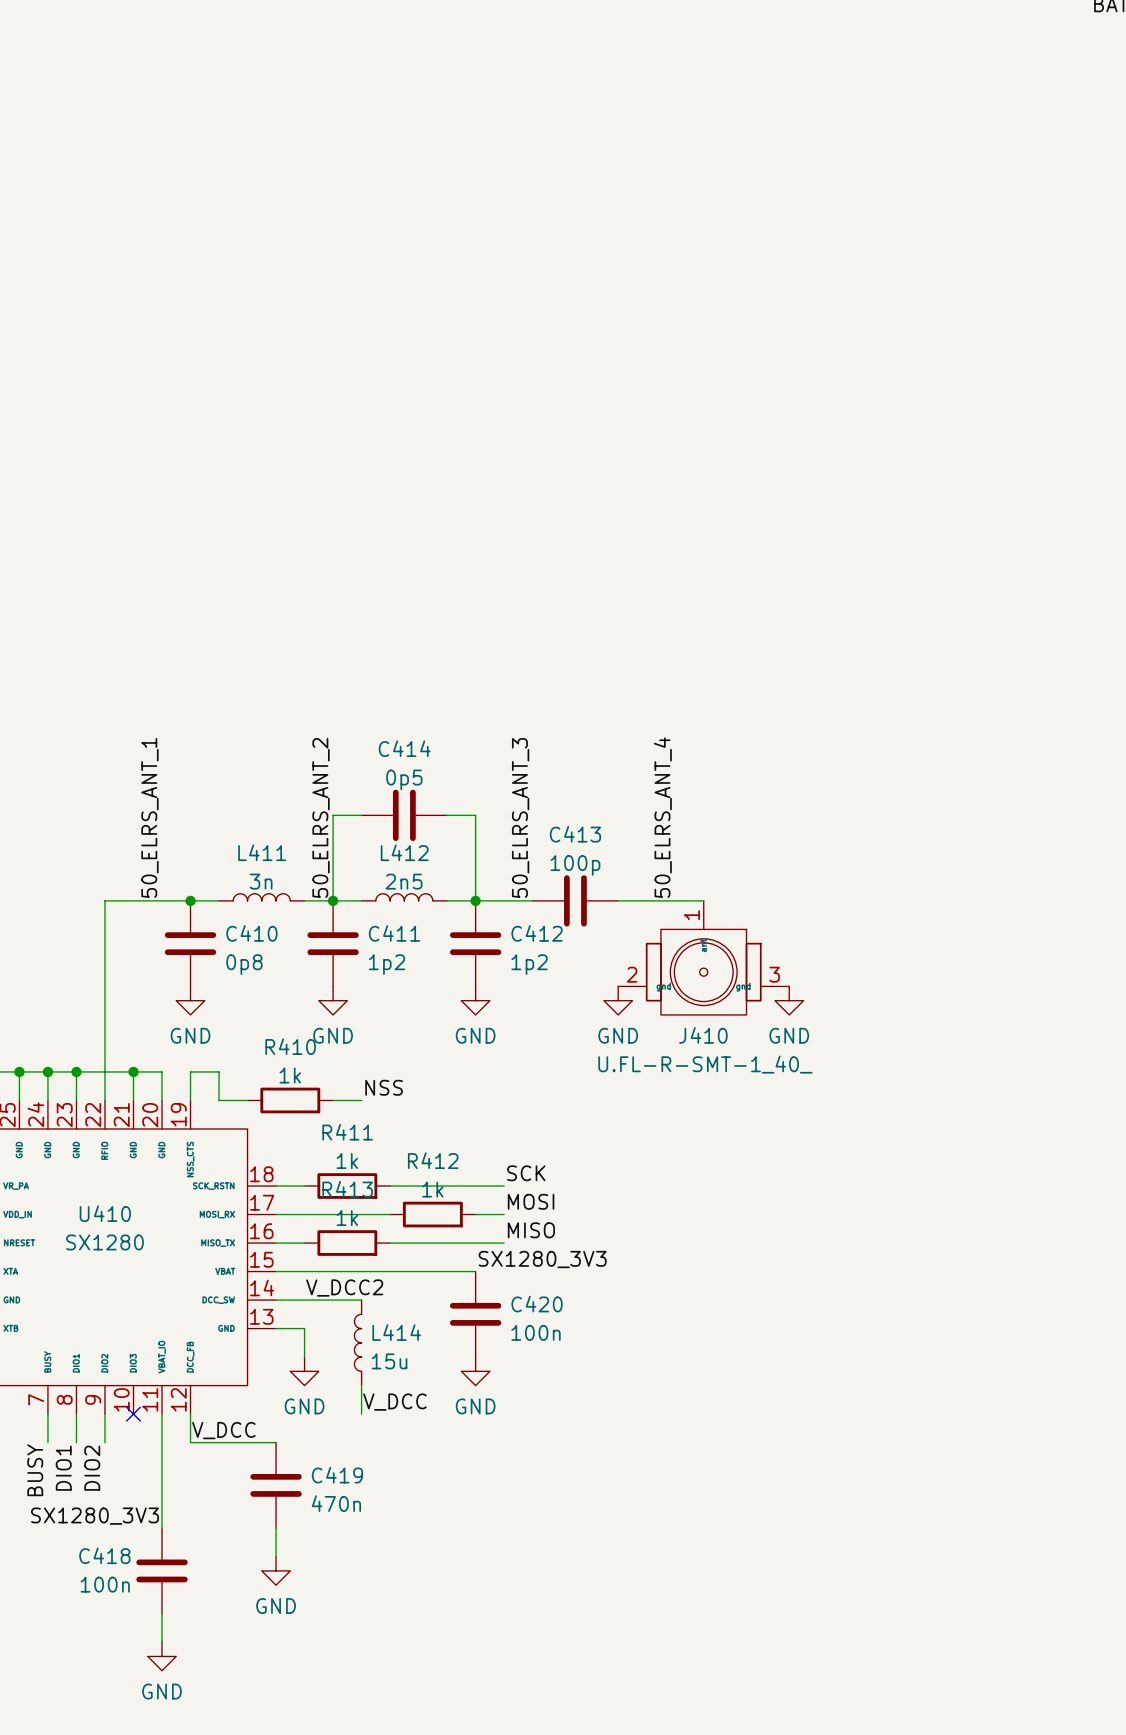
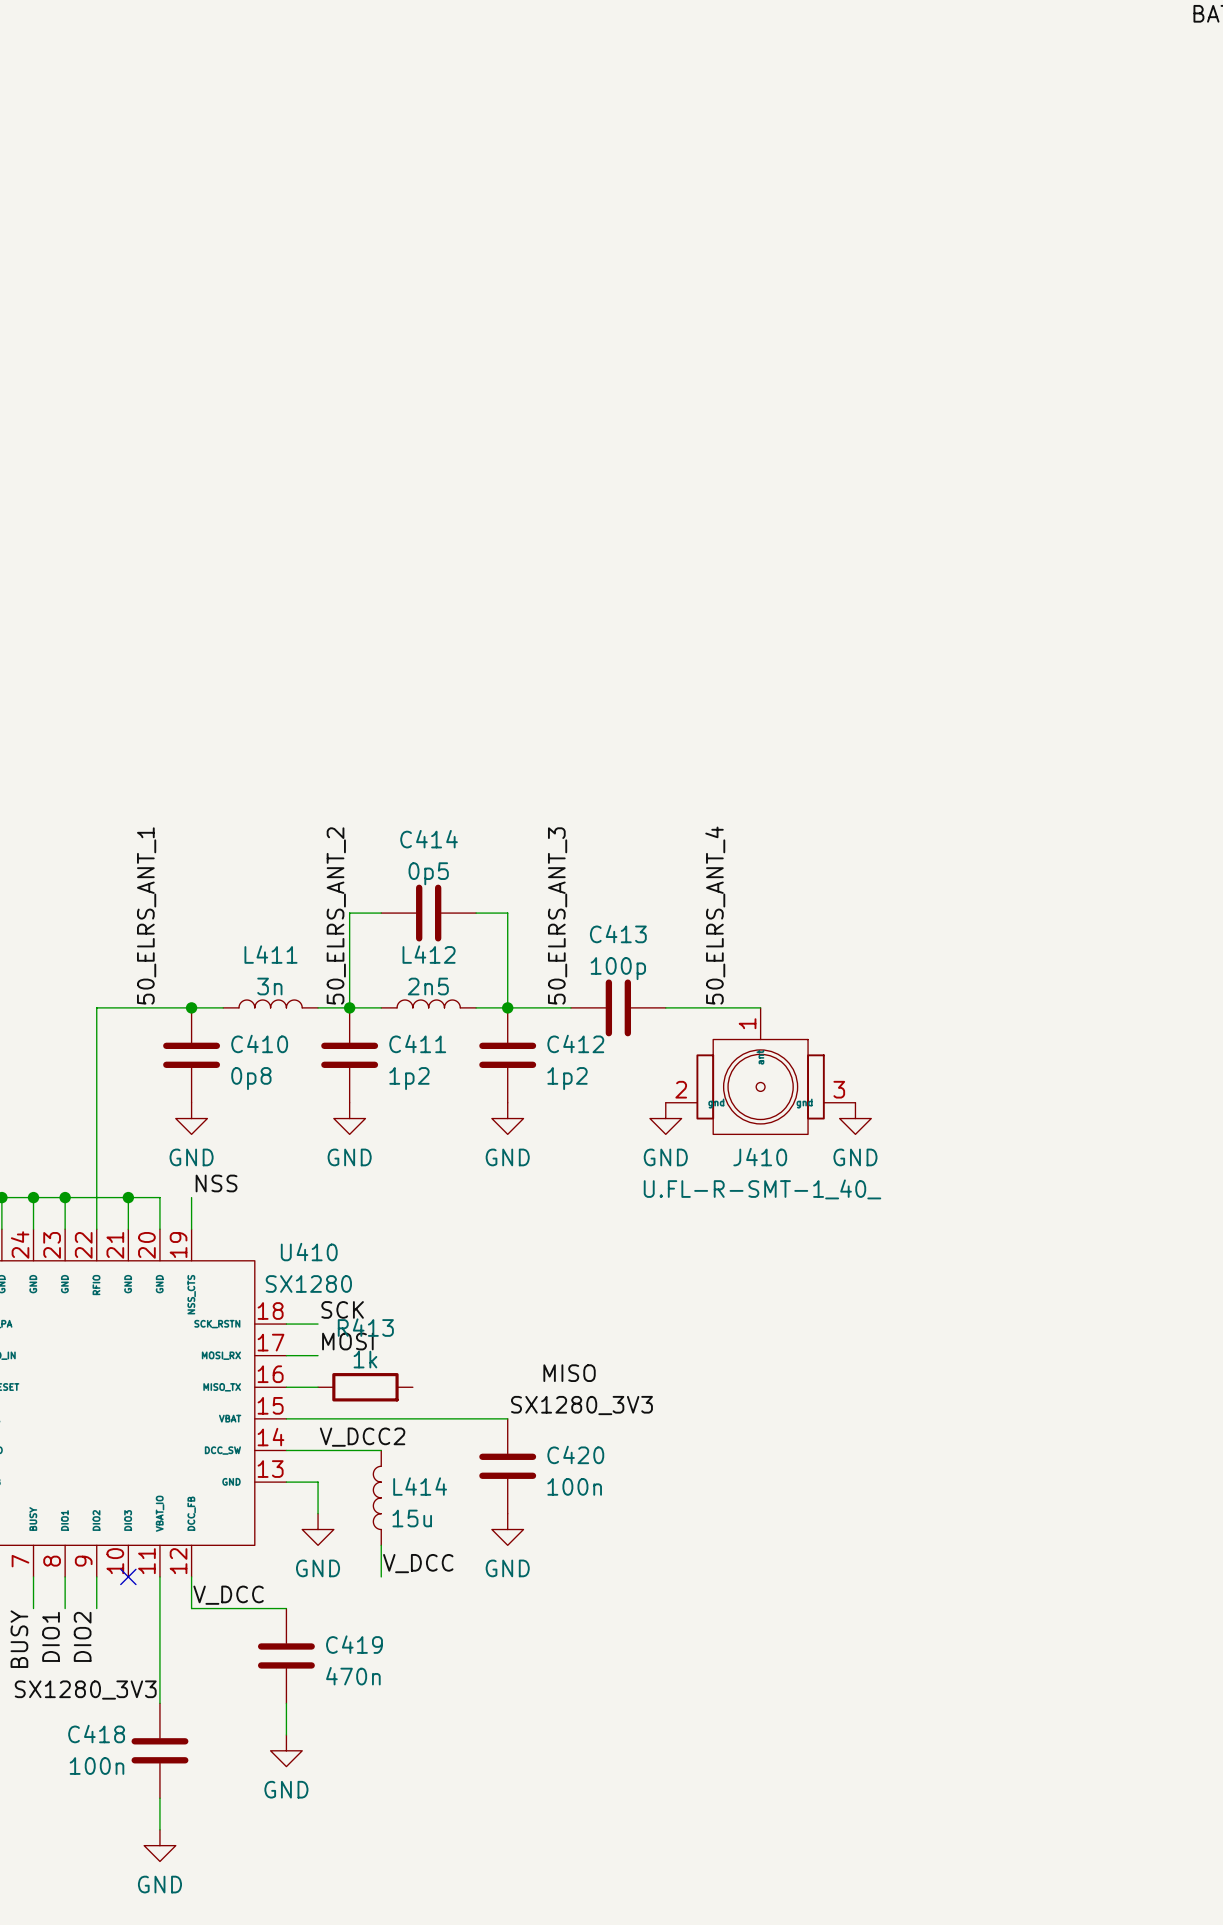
wire: (190, 1071) (219, 1071) (219, 1100) (247, 1100) -> none
label position: NSS (384, 1087) -> NSS (216, 1183)
R410: 1k (290, 1100) -> none
wire: (333, 1100) (361, 1100) -> none
label position: SCK (526, 1173) -> SCK (342, 1309)
R411: 1k (347, 1186) -> none
wire: (390, 1186) (504, 1186) -> none
label position: MOSI (531, 1201) -> MOSI (347, 1341)
U410 name position: U410 (105, 1213) -> U410 (309, 1252)
wire: (304, 1214) (390, 1214) -> none
R412: 1k (432, 1214) -> none
wire: (475, 1214) (504, 1214) -> none
U410 value position: SX1280 (104, 1242) -> SX1280 (308, 1283)
wire: (390, 1243) (504, 1243) -> none

